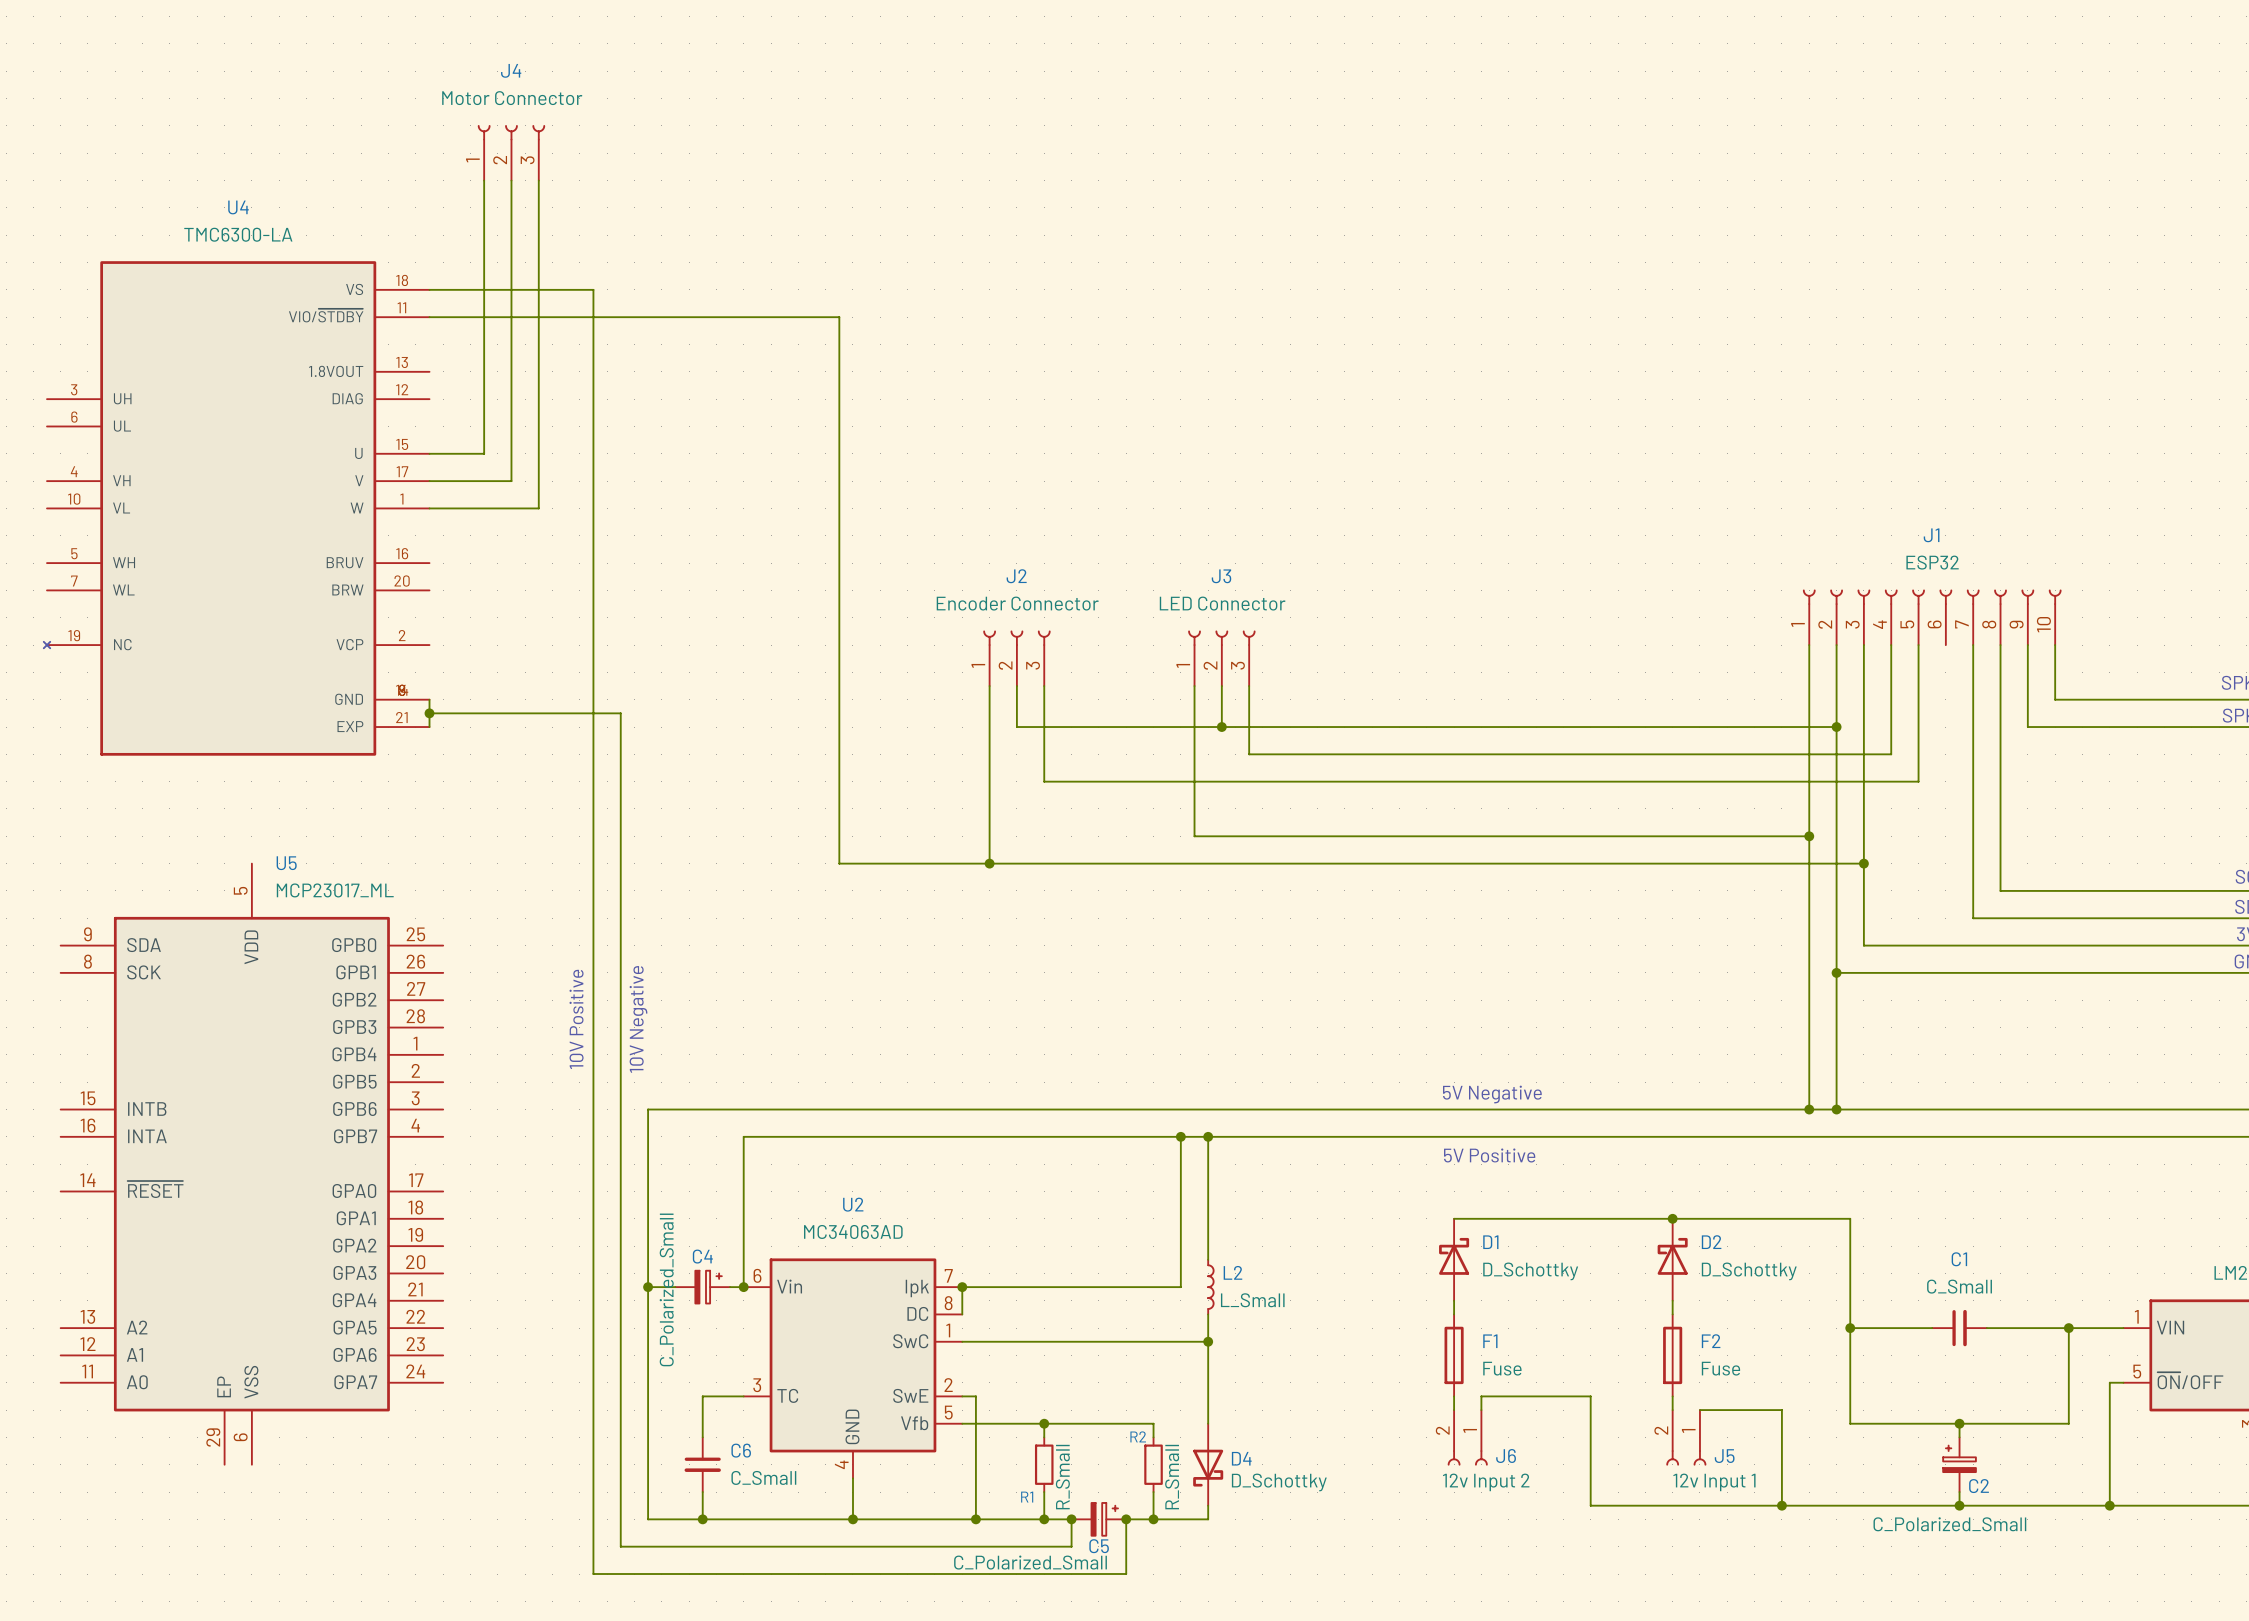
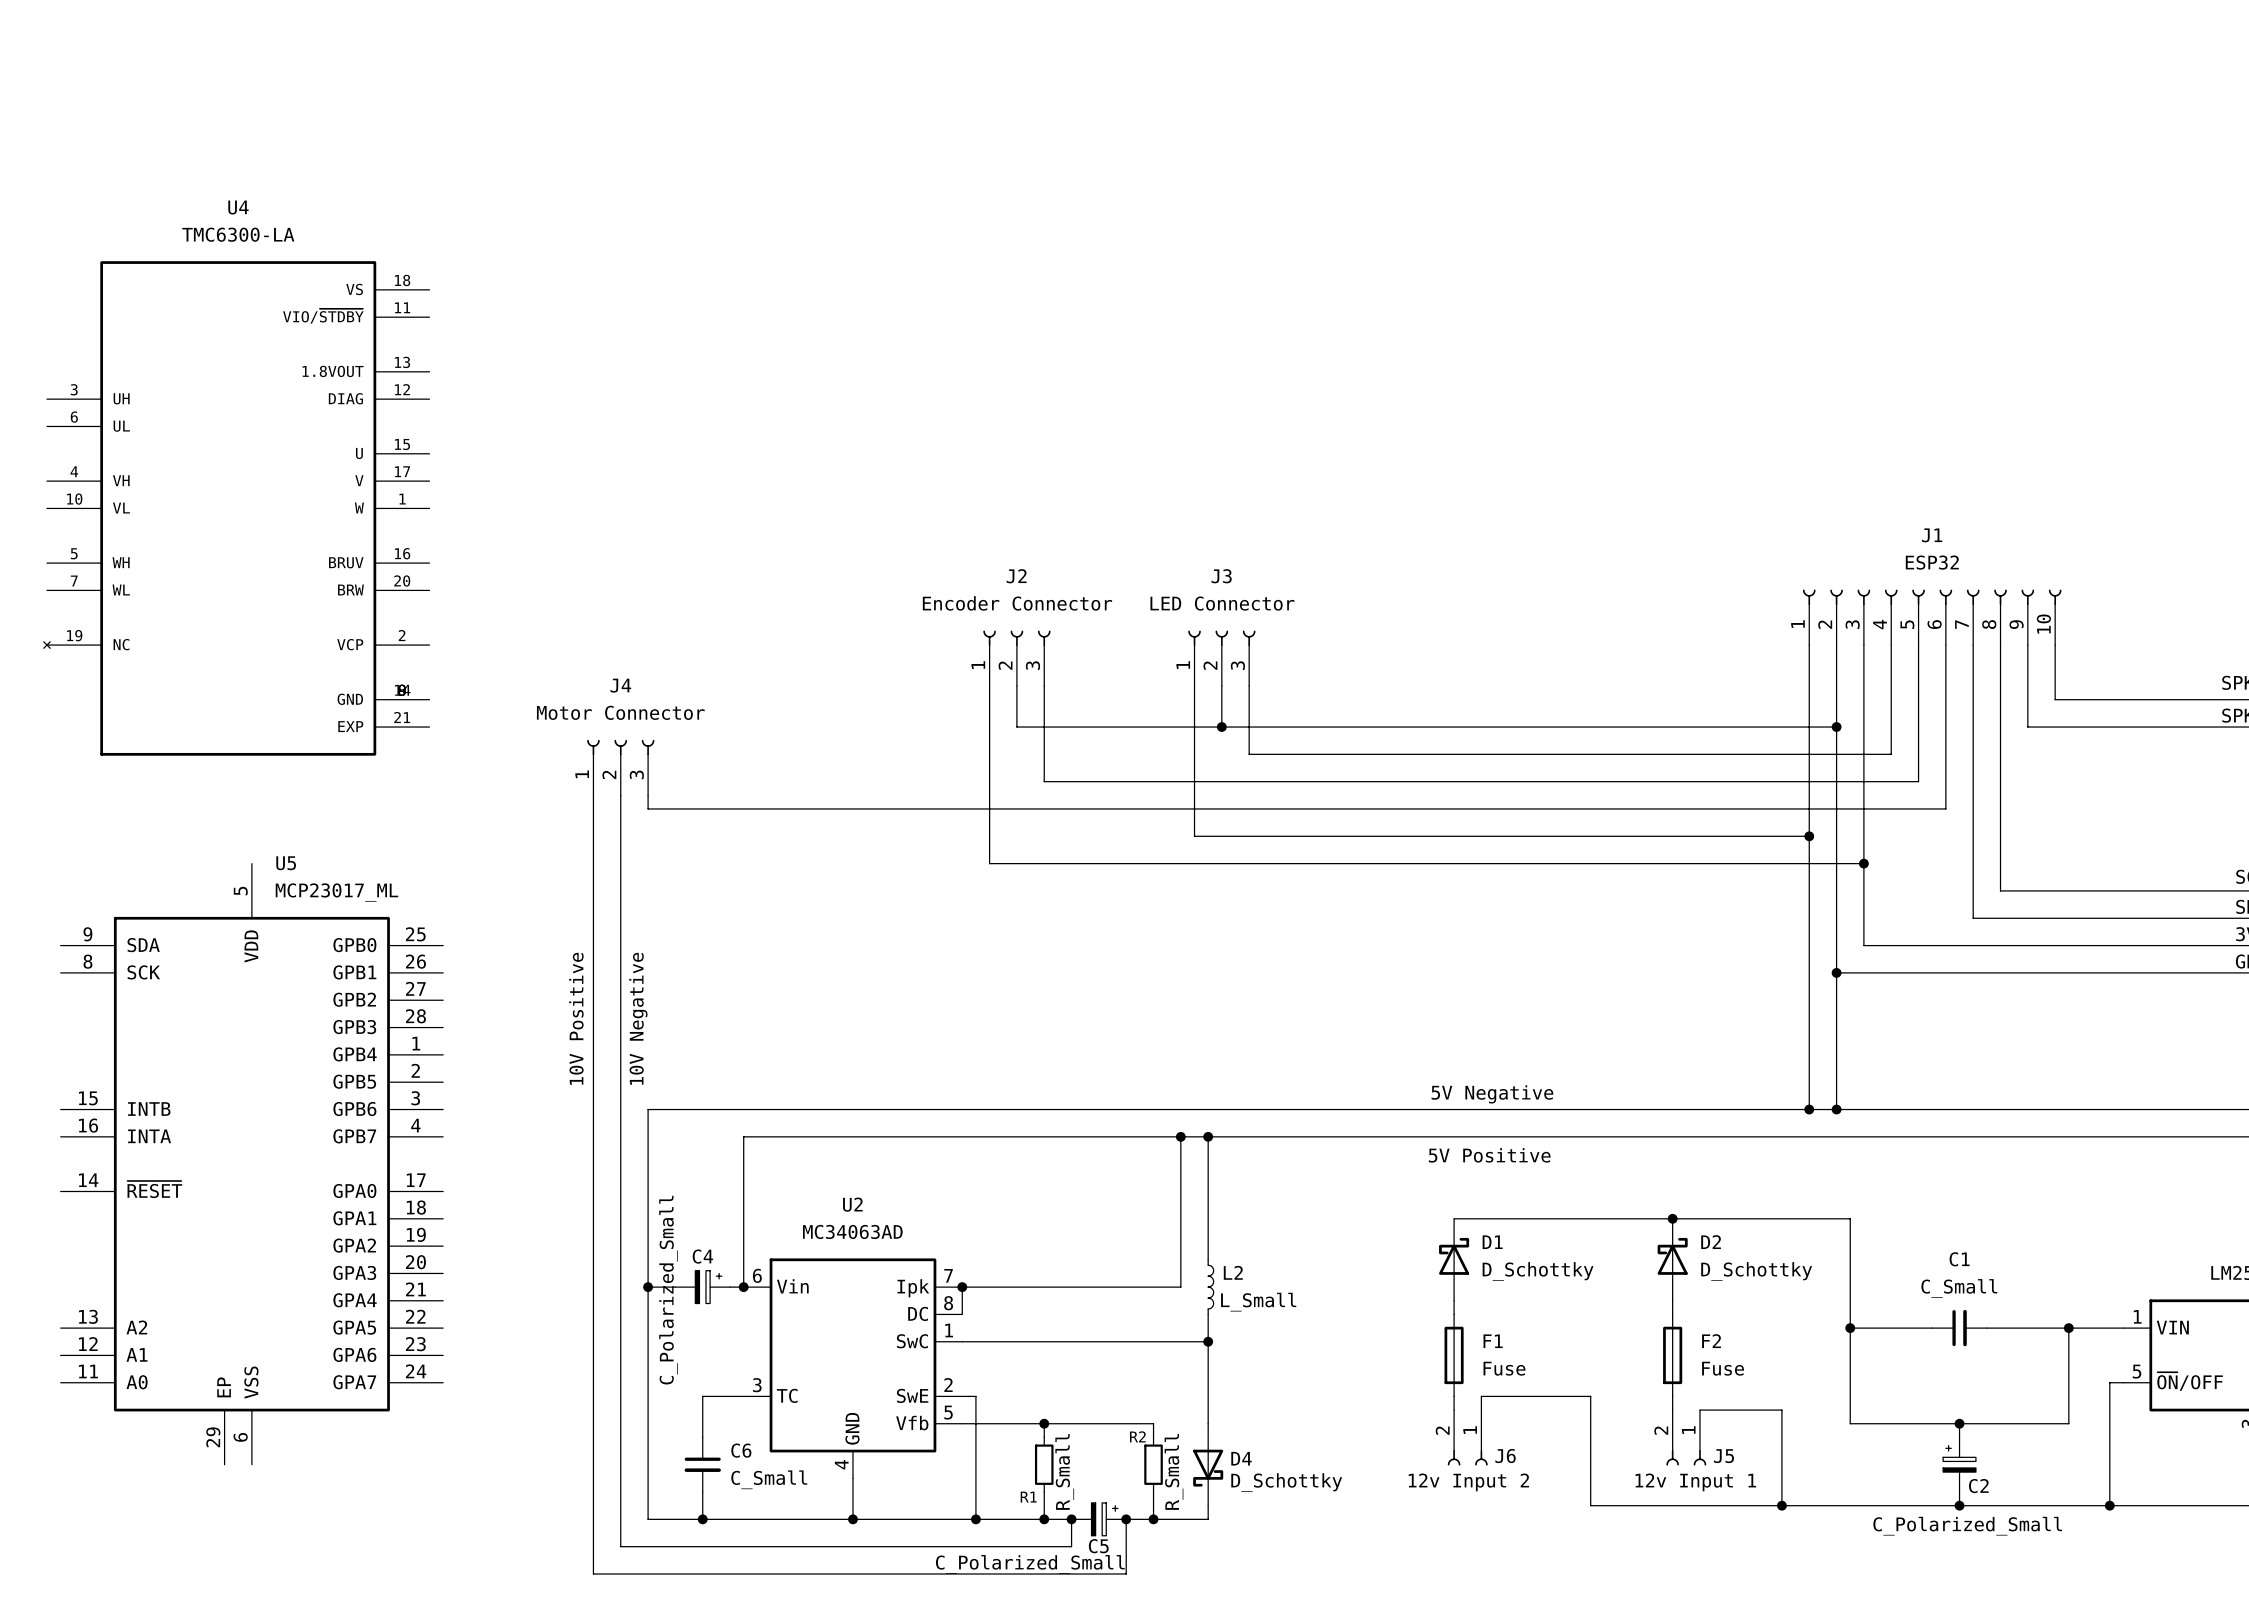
J4 position: (511, 152) -> (620, 767)
wire: (484, 180) (484, 453) (429, 453) -> none
wire: (511, 180) (511, 481) (429, 481) -> none
wire: (538, 180) (538, 508) (429, 508) -> none
wire: (429, 289) (593, 289) (593, 795) -> none
wire: (429, 317) (839, 317) (839, 863) (989, 863) -> none
wire: none -> (1945, 645) (1945, 808) (648, 808) (648, 795)
wire: (429, 699) (429, 727) -> none
wire: (429, 713) (620, 713) (620, 795) -> none
junction: (429, 713) -> none
junction: (989, 863) -> none

